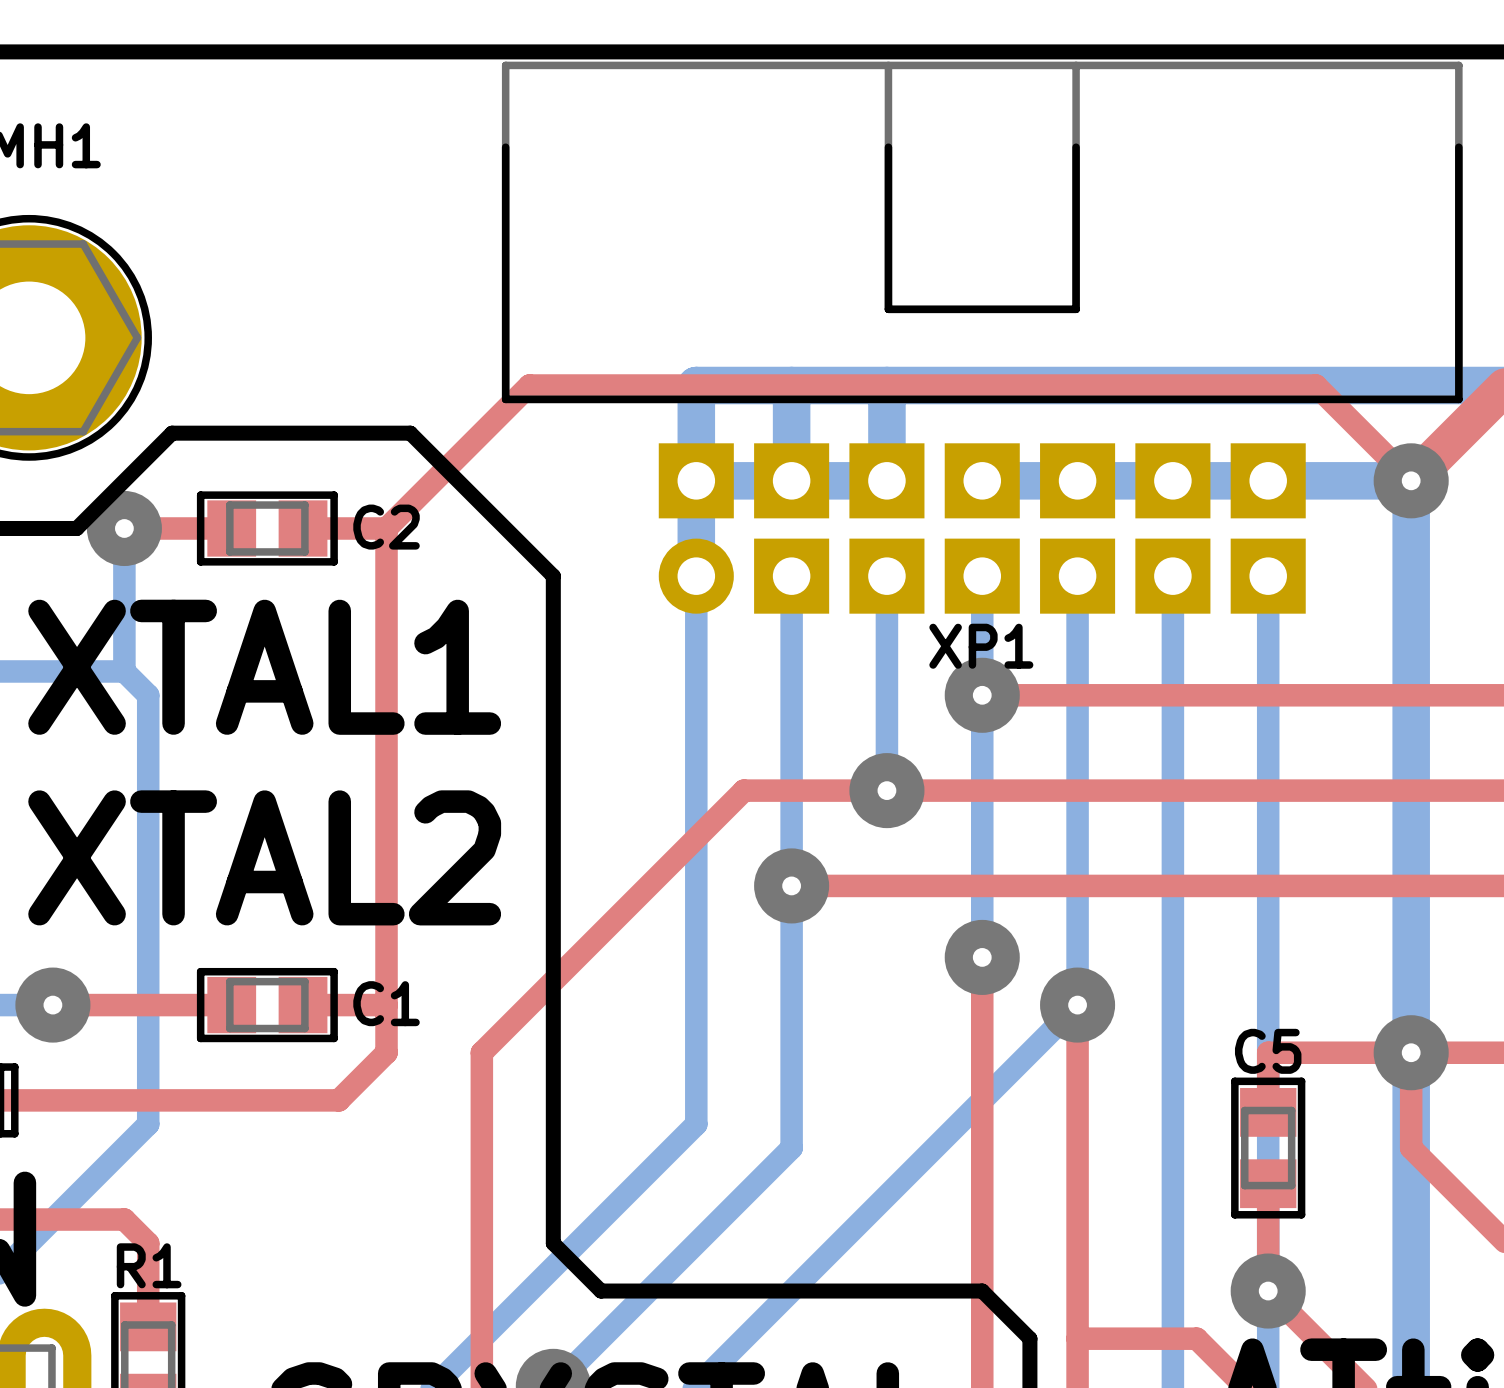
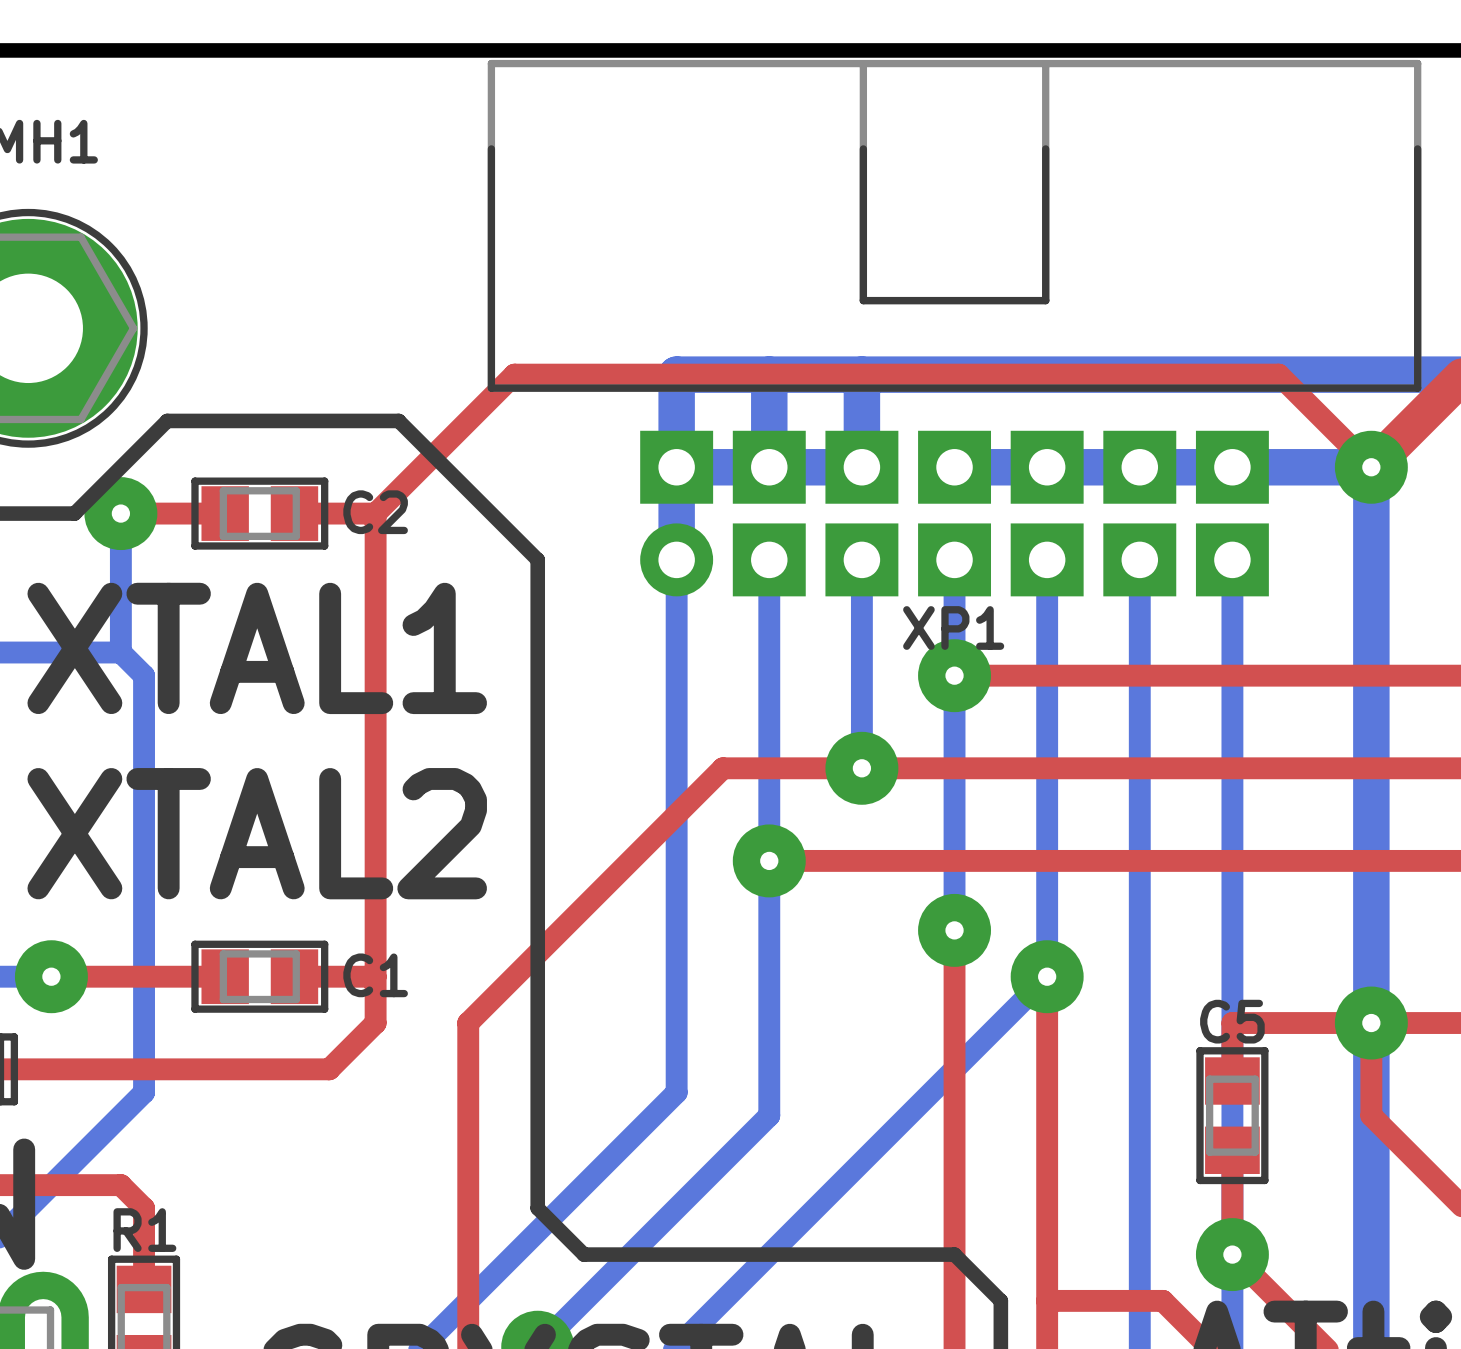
XP1 footprint: [501, 61, 1463, 614] -> [487, 59, 1422, 597]

